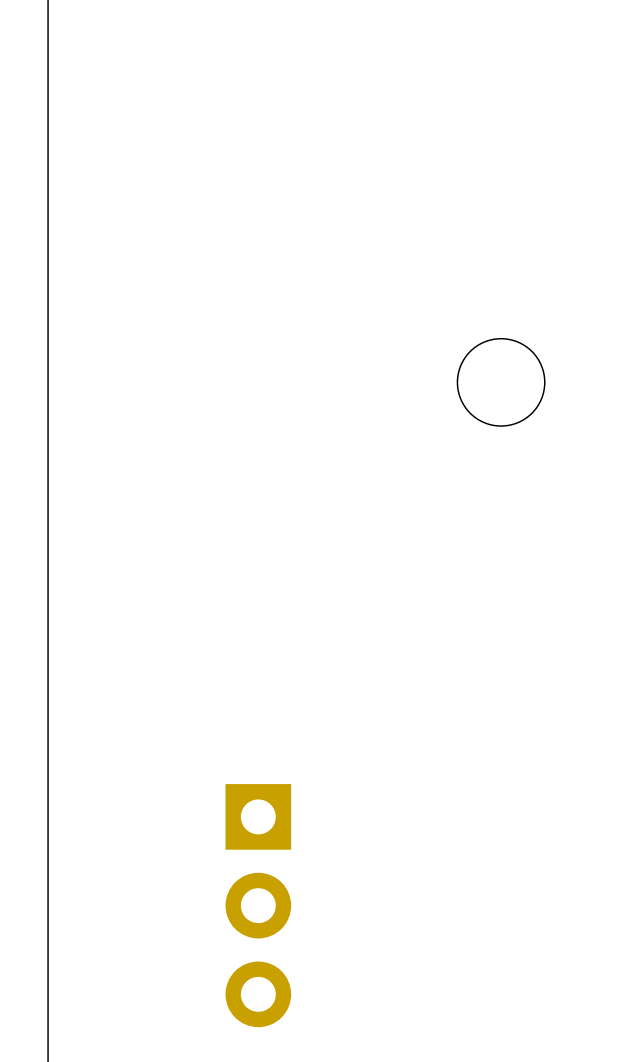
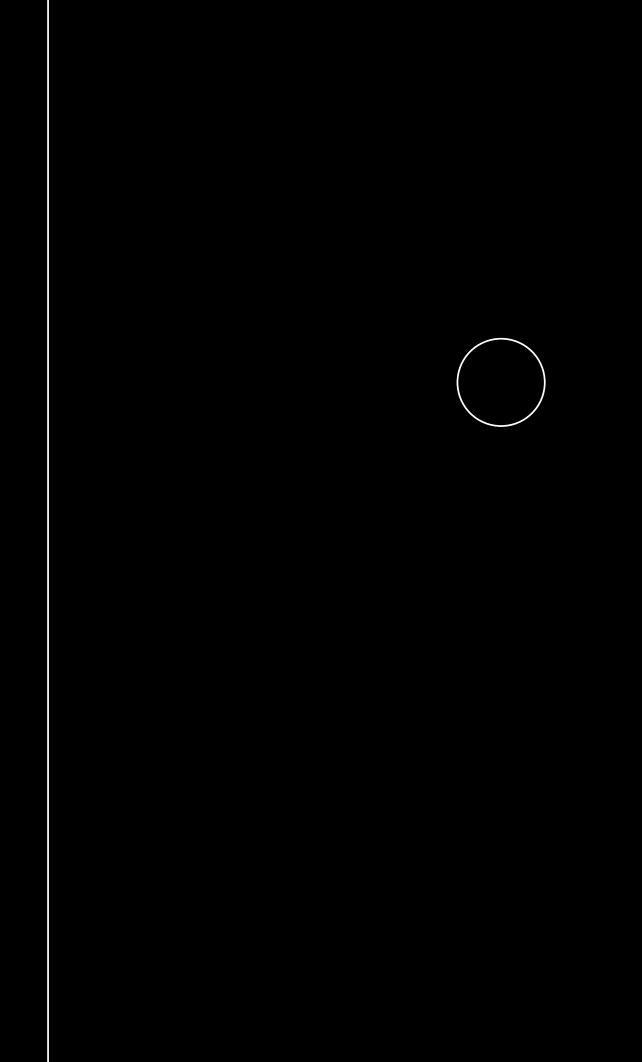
part: (258, 905) -> none

